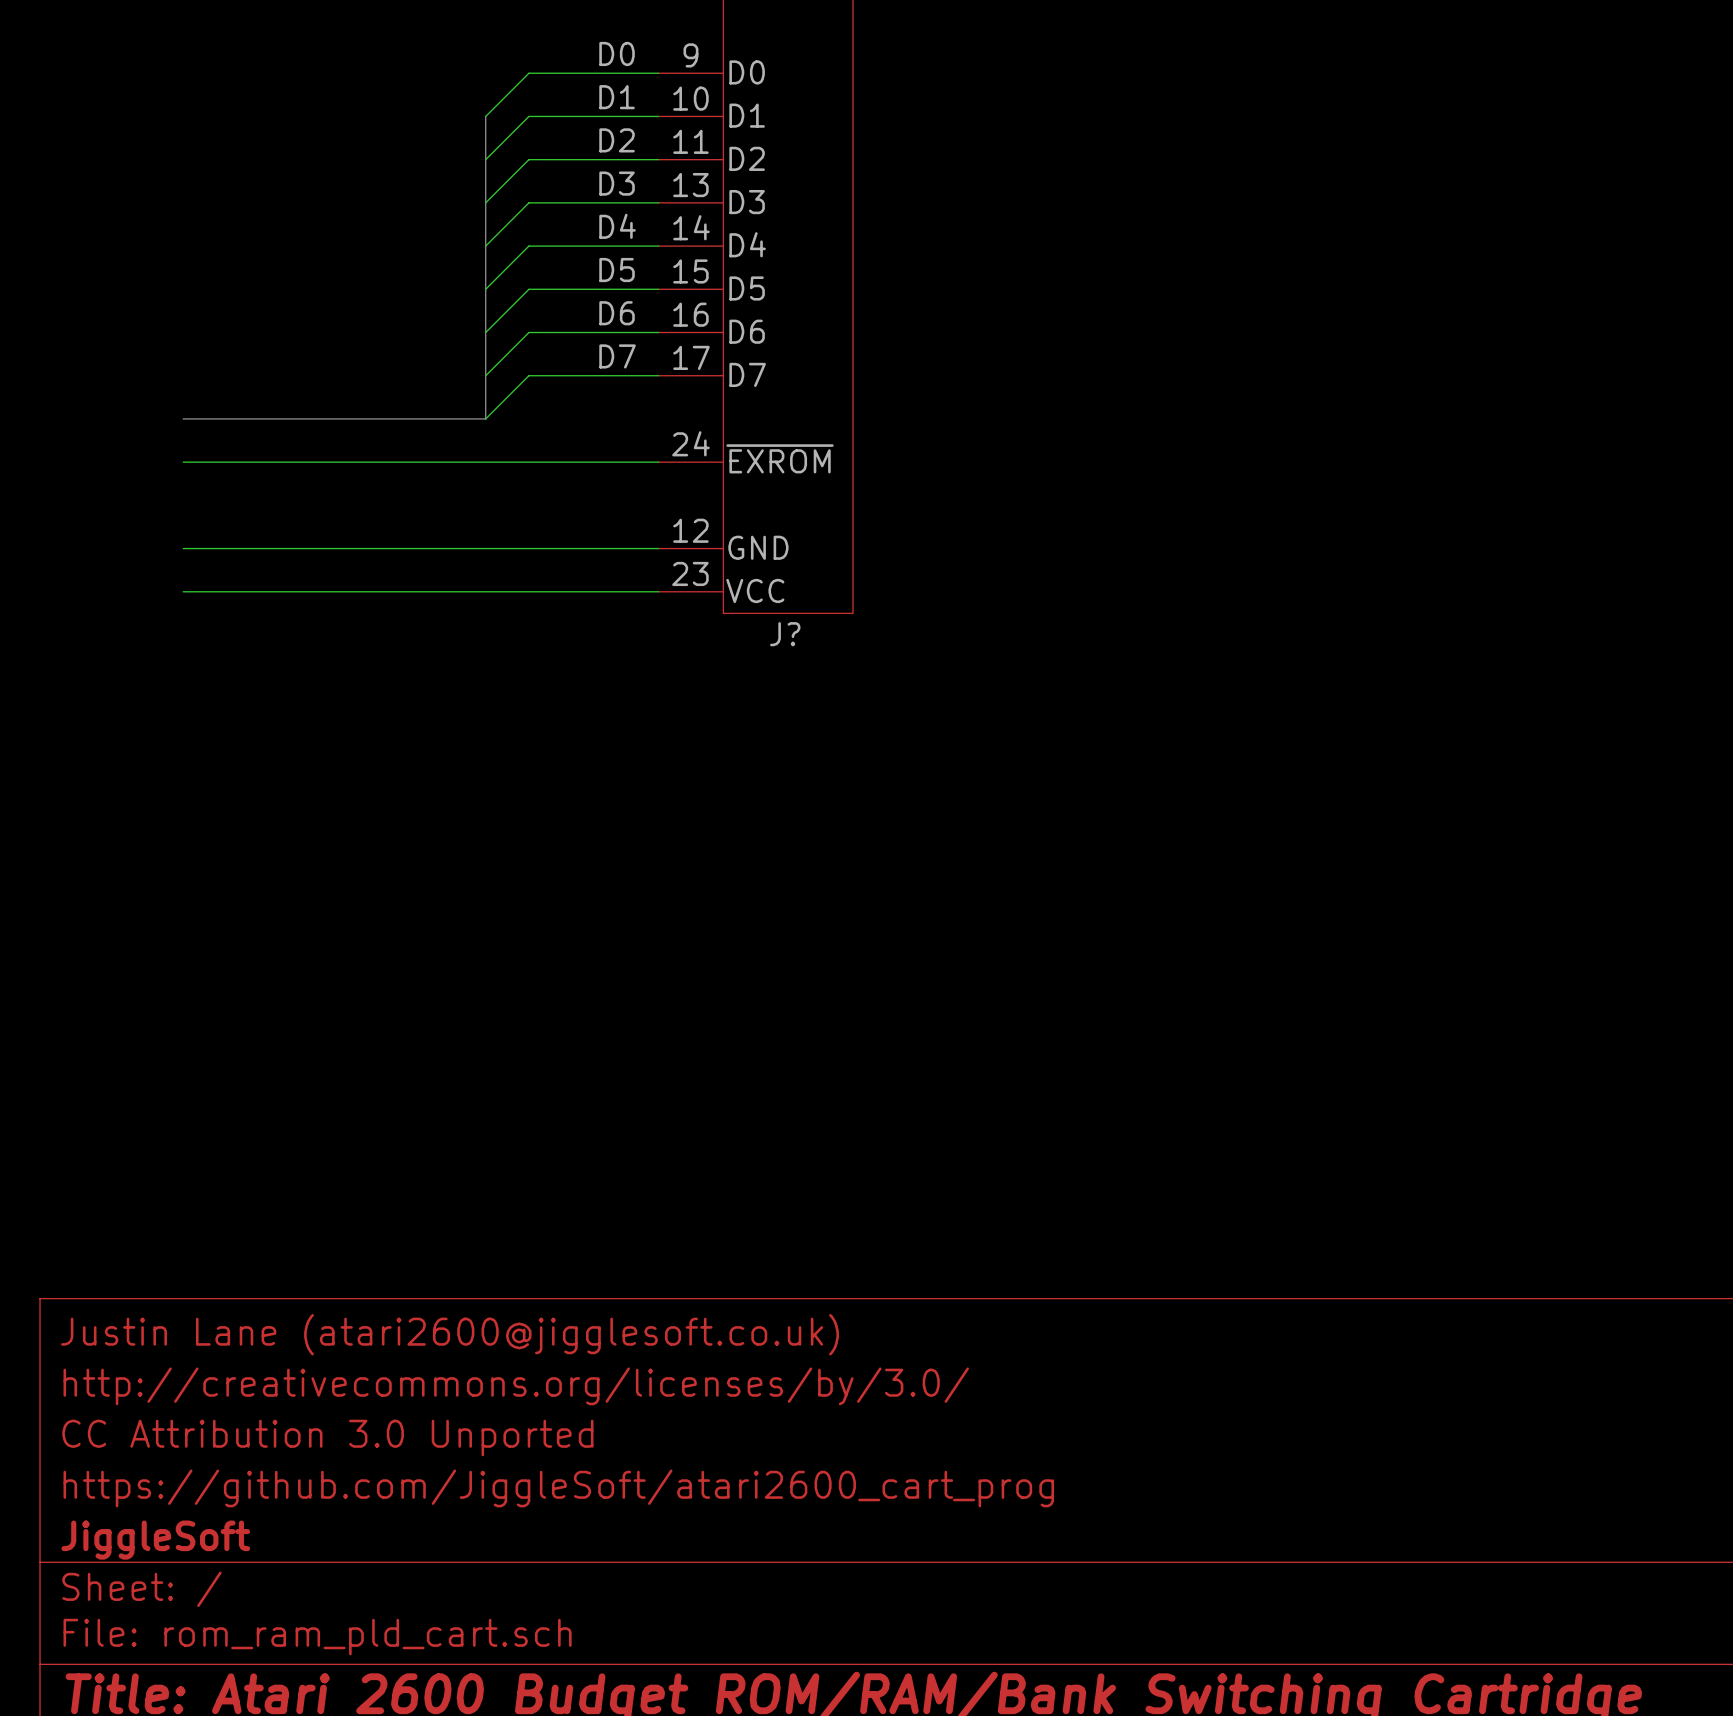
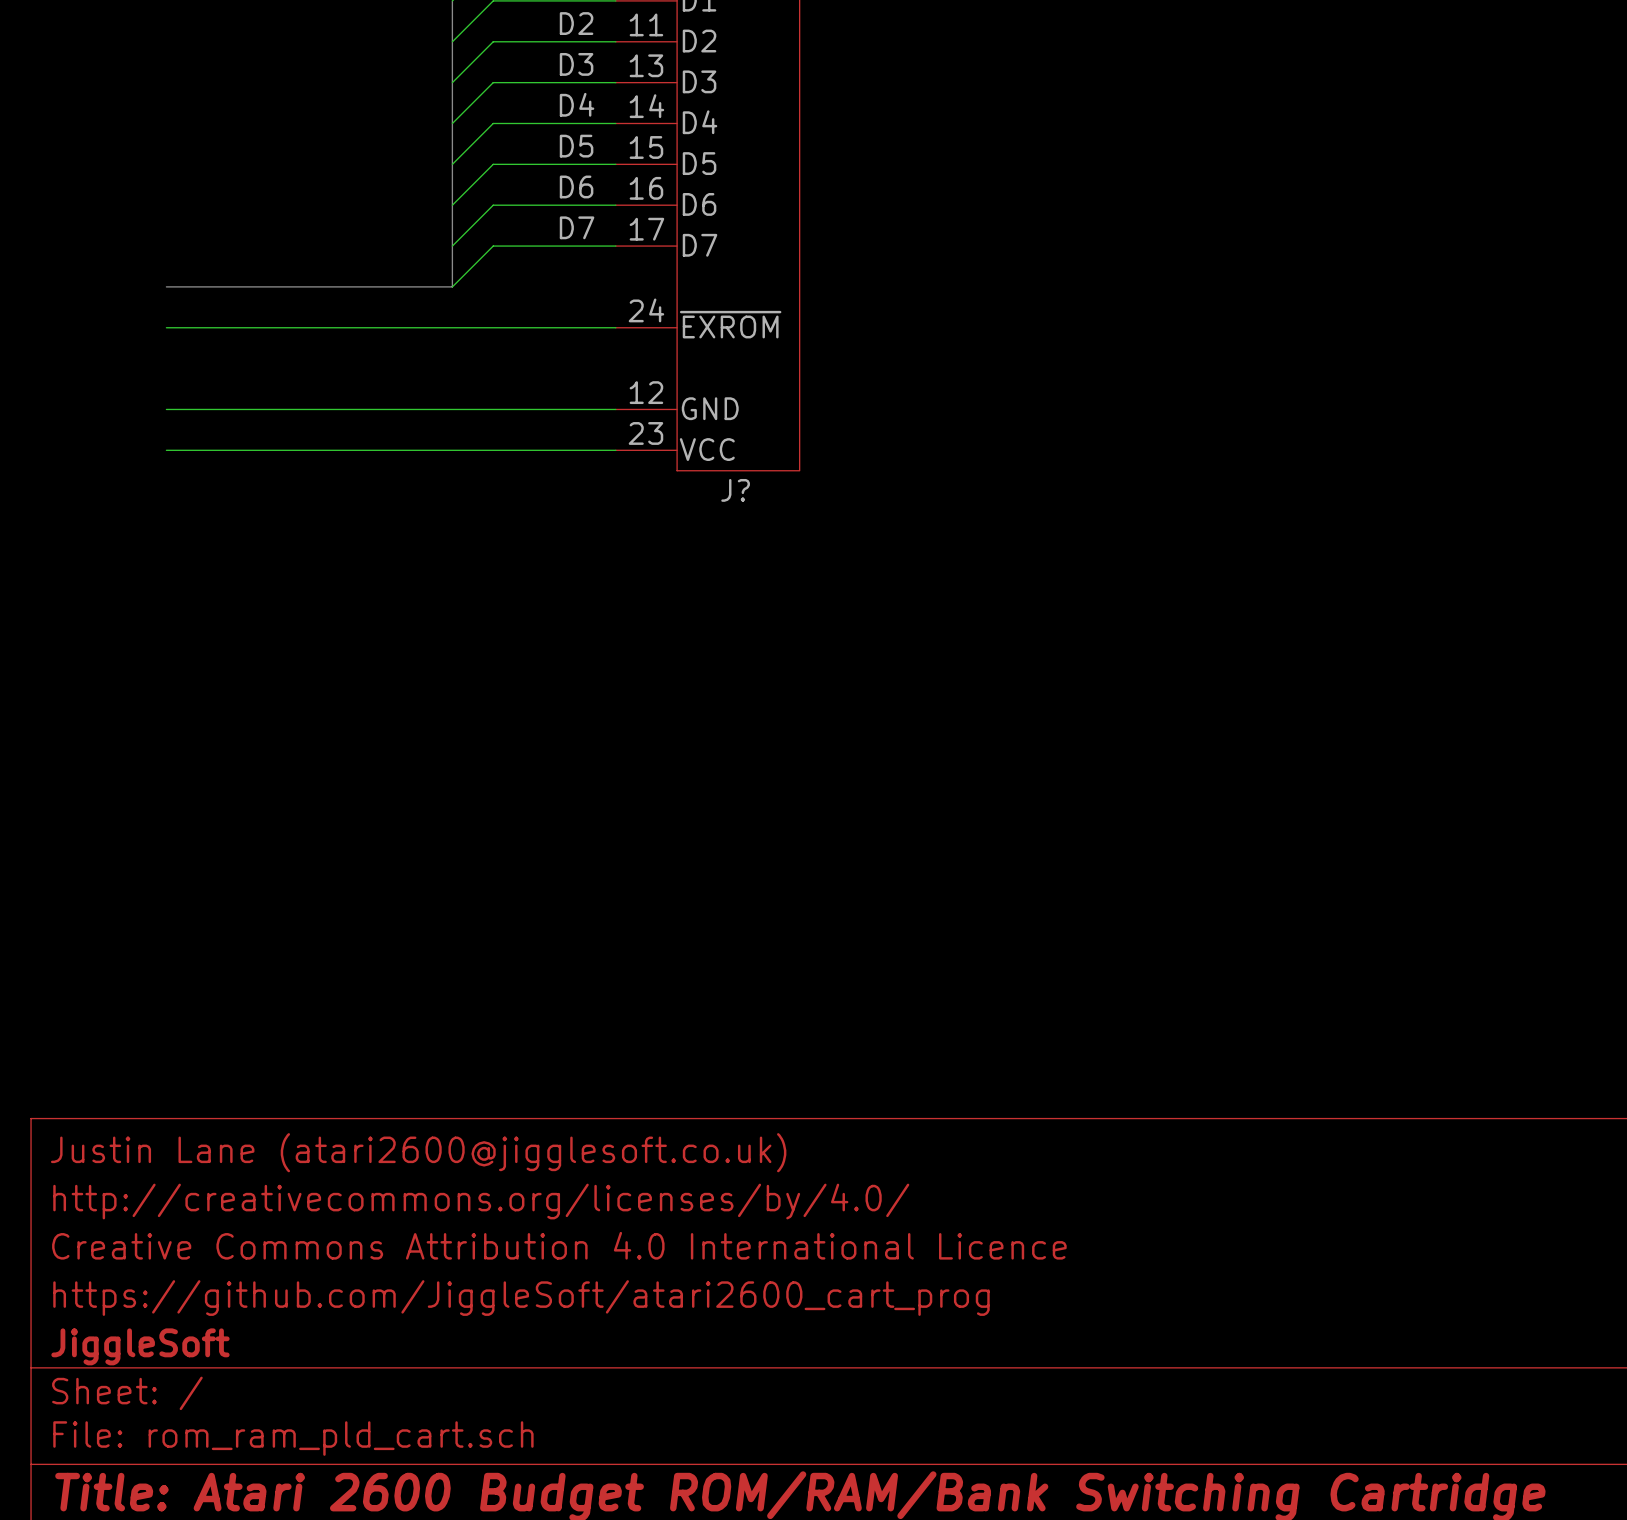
title block: http://creativecommons.org/licenses/by/3.0/ (516, 1386) -> http://creativecommons.org/licenses/by/4.0/ (481, 1201)
title block: CC Attribution 3.0 Unported (327, 1438) -> Creative Commons Attribution 4.0 International Licence (559, 1245)

